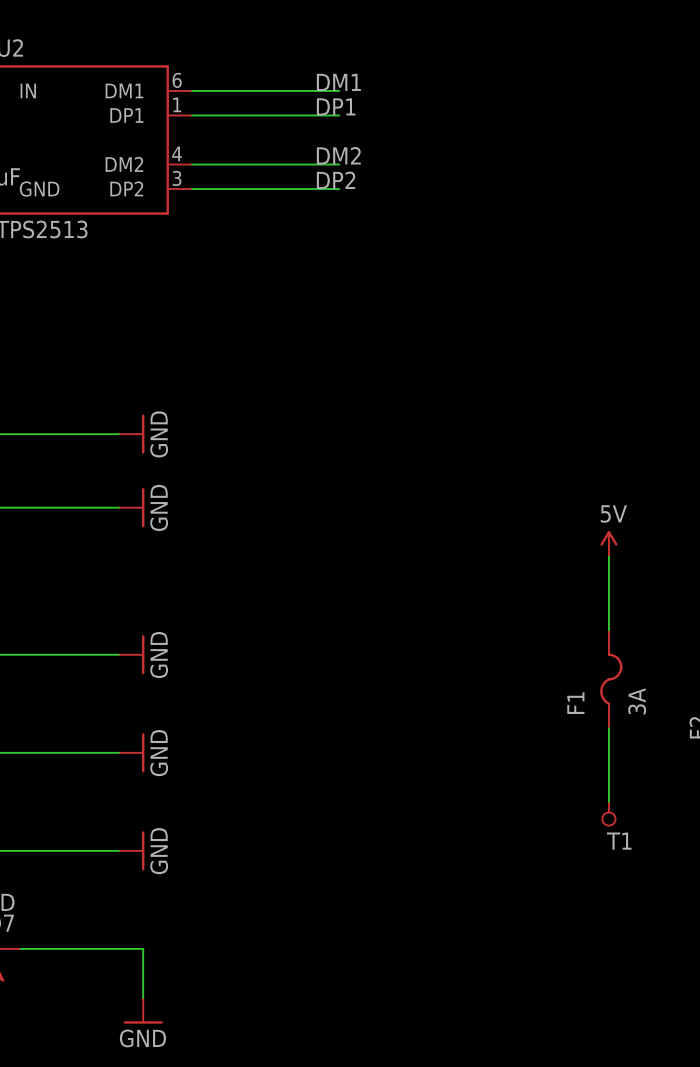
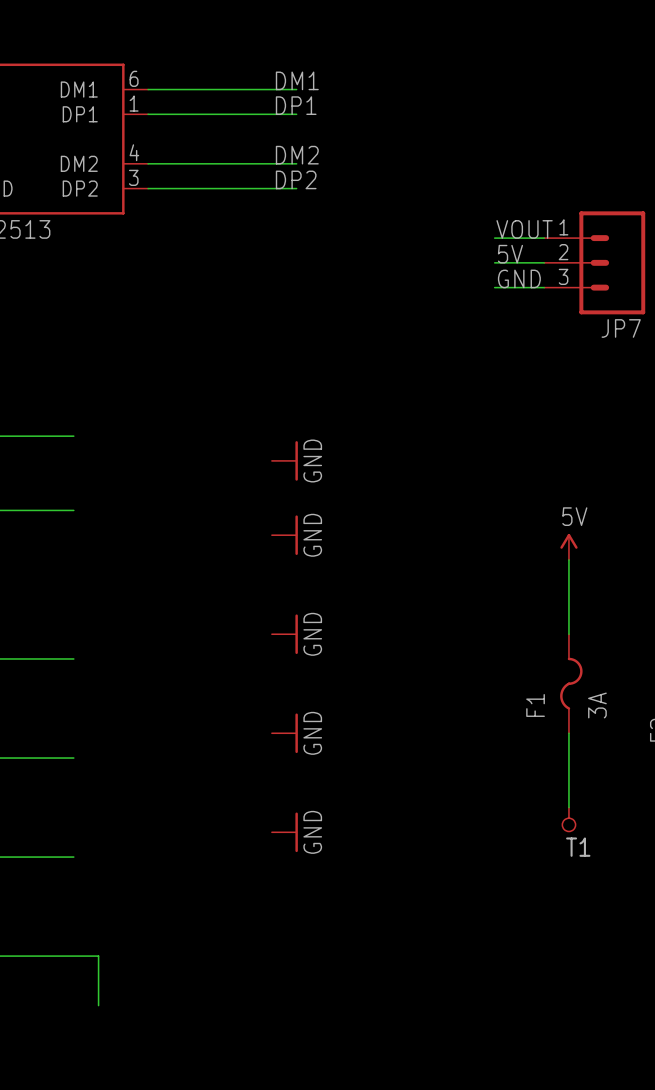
label: none -> VOUT (524, 229)
wire: none -> (494, 238) (544, 238)
label: none -> 5V (510, 254)
wire: none -> (494, 262) (544, 262)
JP7: none -> (594, 262)
label: none -> GND (519, 278)
wire: none -> (494, 287) (544, 287)
power symbol: GND (131, 434) -> none
power symbol: none -> GND (284, 460)
power symbol: GND (131, 507) -> none
power symbol: none -> GND (284, 535)
power symbol: none -> GND (284, 634)
power symbol: GND (131, 654) -> none
power symbol: none -> GND (284, 733)
power symbol: GND (131, 752) -> none
power symbol: none -> GND (284, 832)
power symbol: GND (131, 850) -> none
power symbol: GND (143, 1010) -> none

